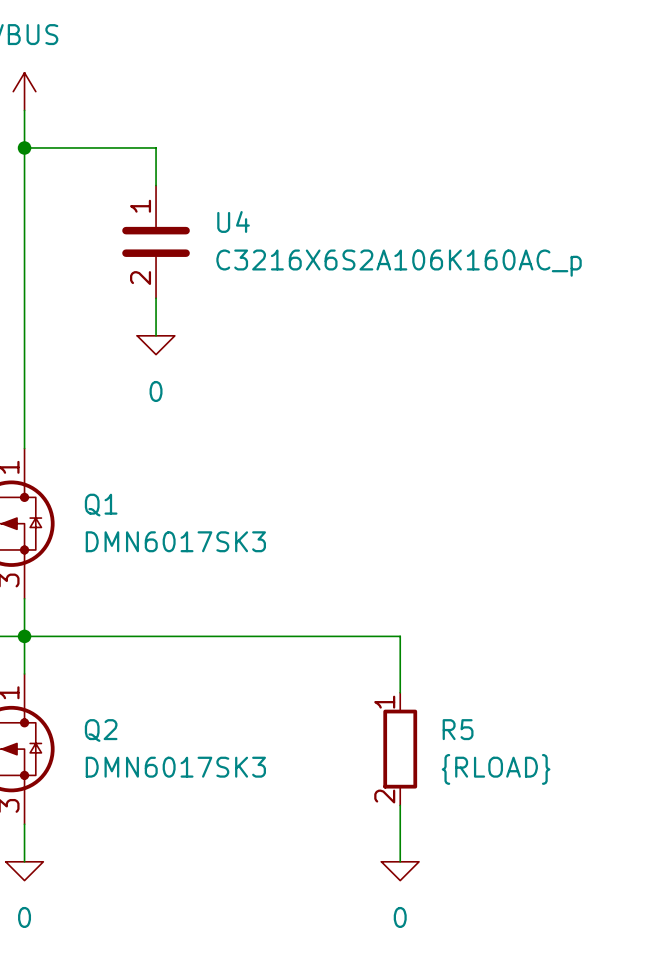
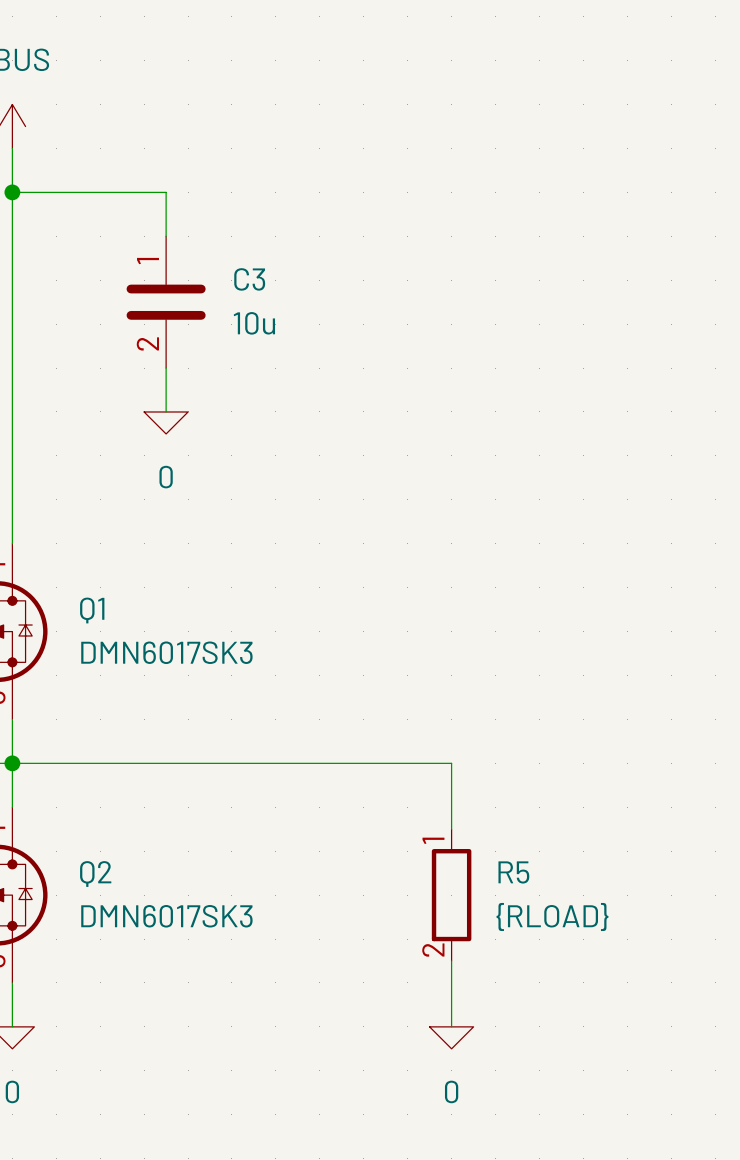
U4 name: U4 (233, 221) -> C3 (249, 279)
U4 value: C3216X6S2A106K160AC_p (399, 263) -> 10u (254, 323)

